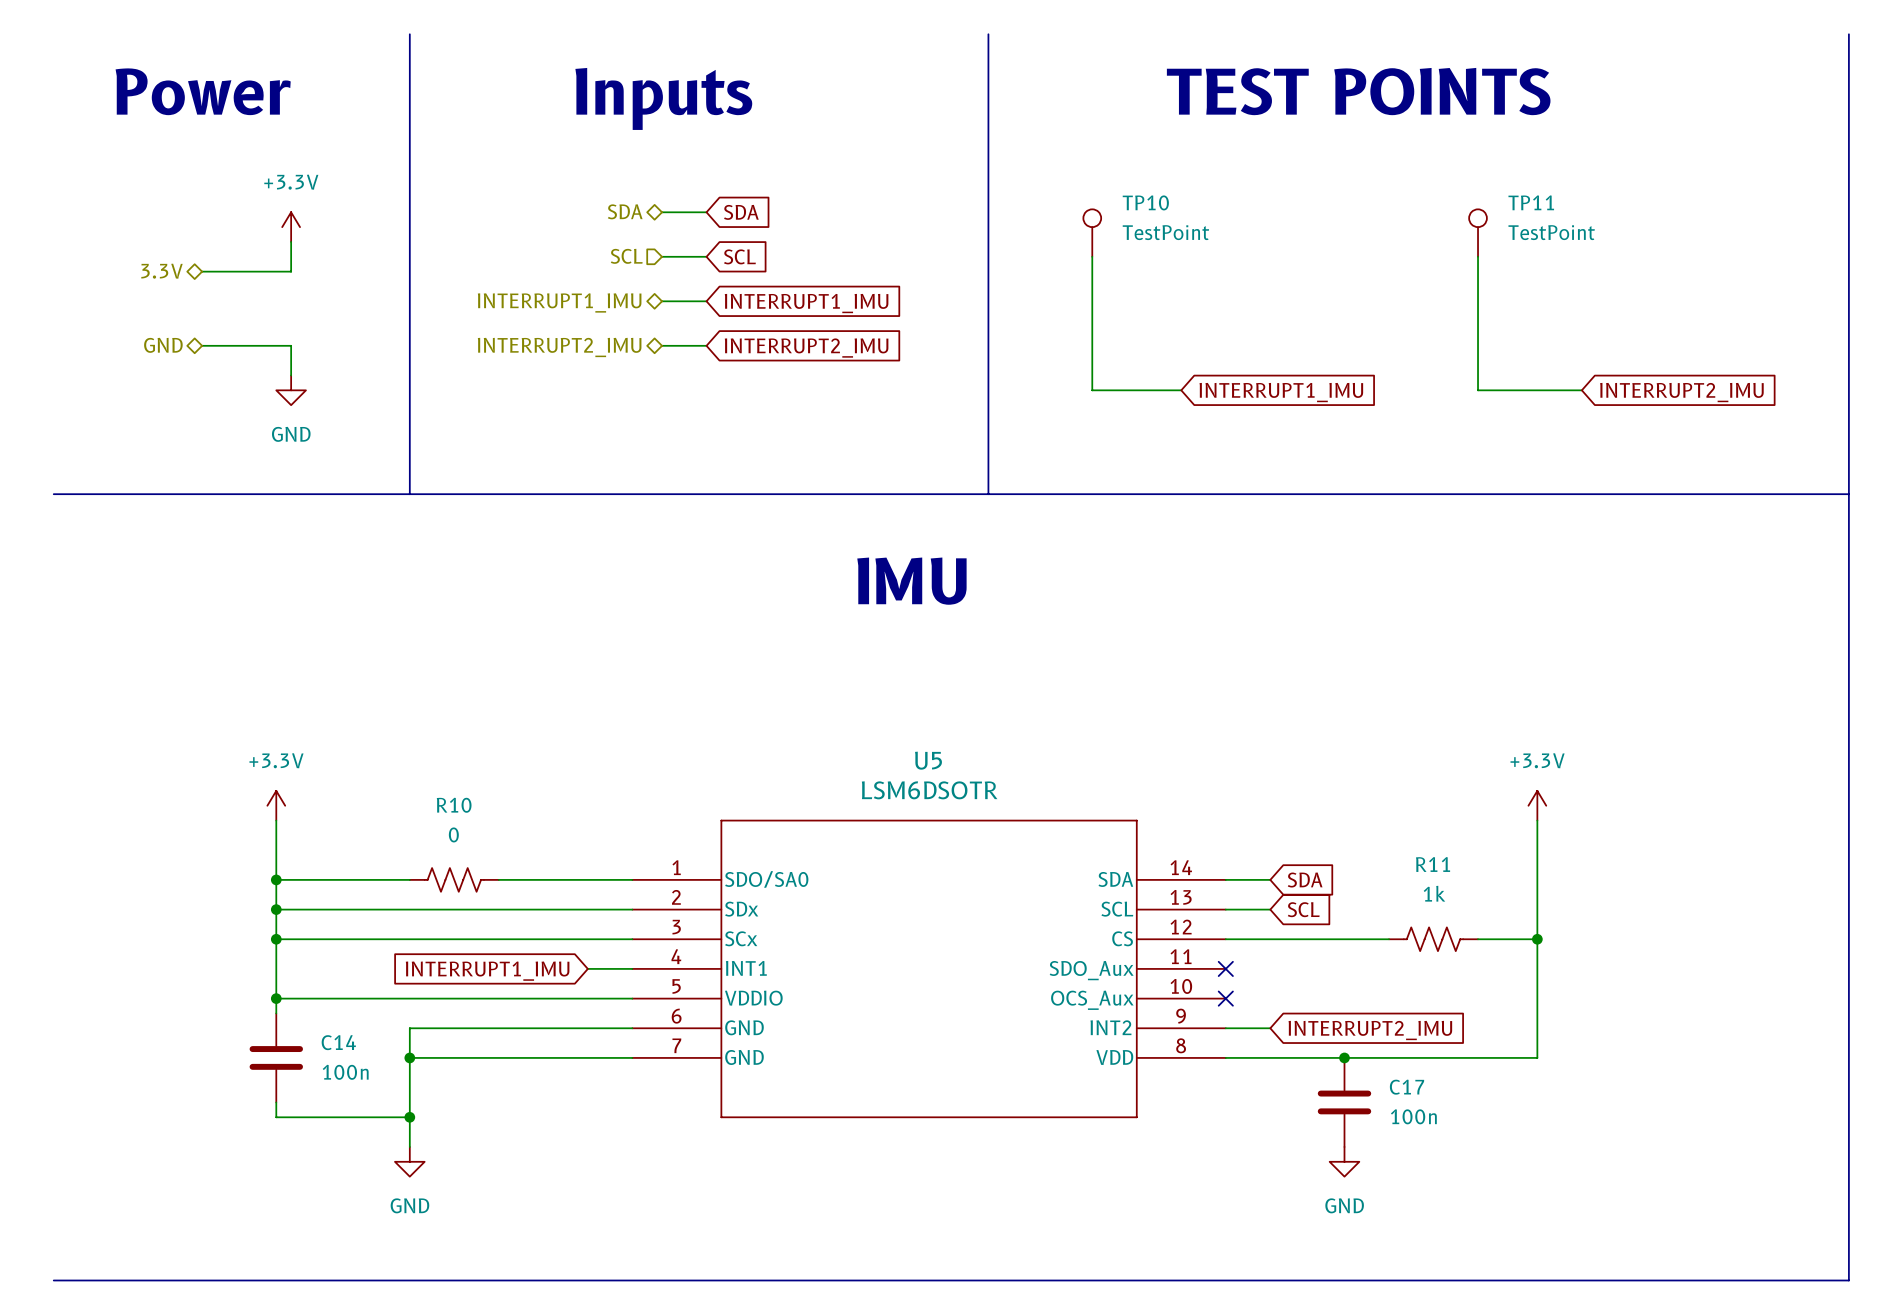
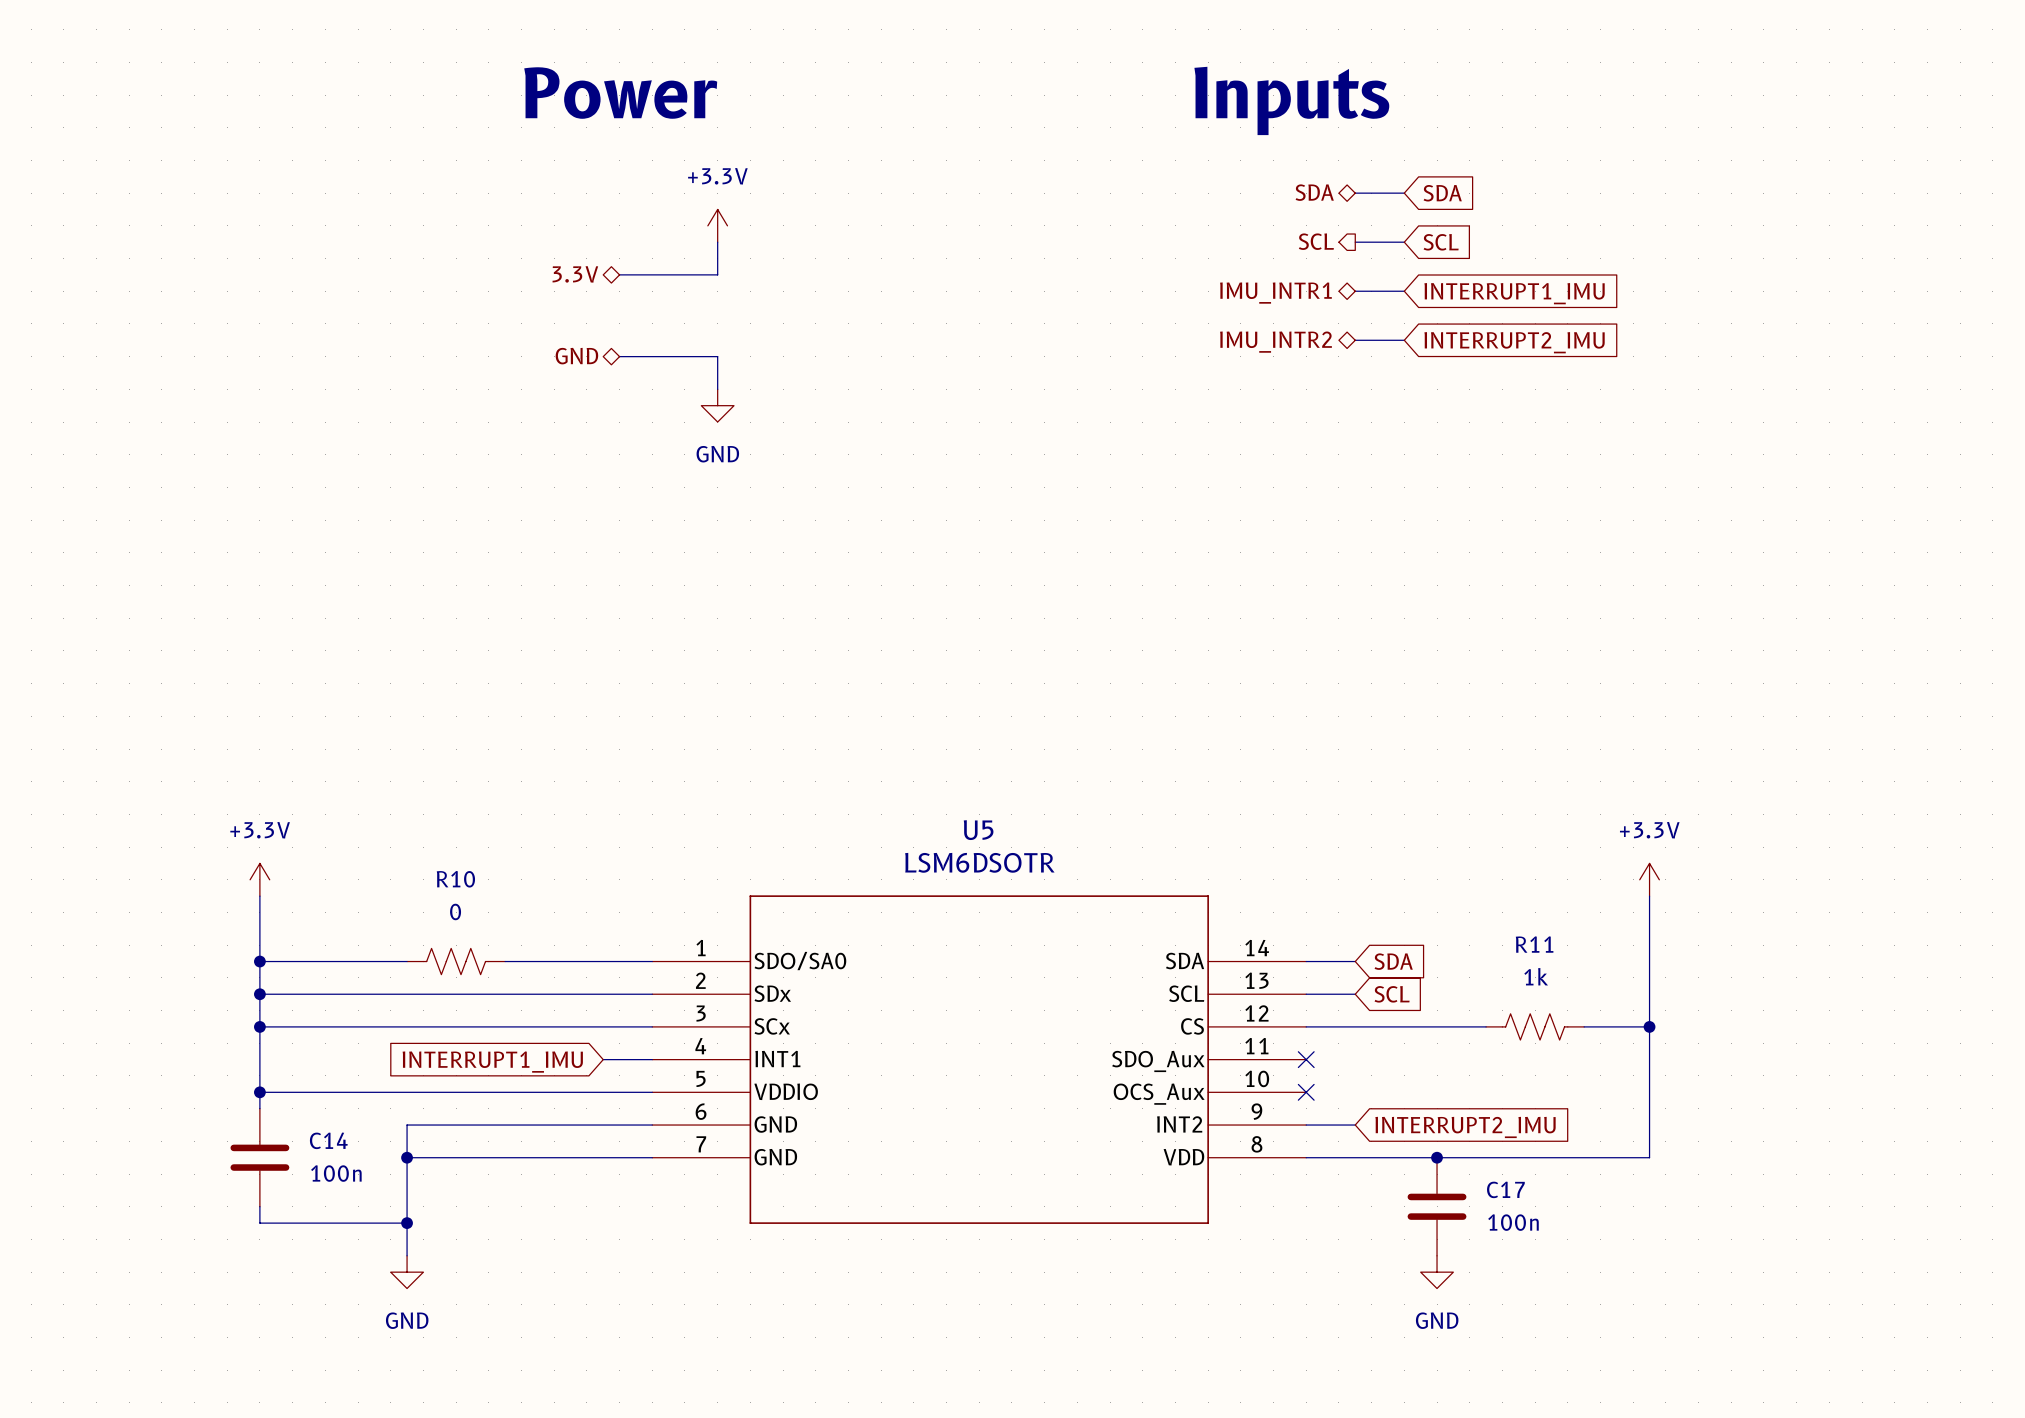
line: (409, 34) (409, 494) -> none
line: (988, 34) (988, 494) -> none
line: (1848, 34) (1848, 1280) (53, 1280) -> none
text: Power (203, 91) -> none
text: none -> Power (620, 93)
text: TEST POINTS (1358, 91) -> none
text: Inputs (663, 98) -> none
text: none -> Inputs (1291, 100)
hierarchical label: none -> SDA (1314, 192)
wire: none -> (1355, 193) (1404, 193)
global label: none -> SDA (1442, 193)
hierarchical label: SDA (625, 211) -> none
wire: (662, 212) (706, 212) -> none
power symbol: none -> +3.3V (717, 225)
global label: SDA (741, 212) -> none
hierarchical label: none -> SCL (1316, 241)
power symbol: +3.3V (291, 227) -> none
wire: none -> (1355, 242) (1404, 242)
global label: none -> SCL (1441, 242)
TP10: TestPoint (1092, 233) -> none
TP11: TestPoint (1478, 233) -> none
wire: (291, 241) (291, 271) (202, 271) -> none
hierarchical label: none -> 3.3V (575, 274)
wire: none -> (619, 274) (684, 274)
hierarchical label: SCL (626, 256) -> none
wire: (691, 256) (706, 256) -> (717, 274) (717, 242)
global label: SCL (739, 256) -> none
wire: (1092, 256) (1092, 390) (1181, 390) -> none
wire: (1478, 256) (1478, 390) (1581, 390) -> none
hierarchical label: 3.3V (161, 271) -> none
wire: none -> (1355, 291) (1404, 291)
hierarchical label: none -> IMU_INTR1 (1275, 293)
wire: (662, 301) (706, 301) -> none
hierarchical label: INTERRUPT1_IMU (559, 302) -> none
global label: INTERRUPT1_IMU (806, 303) -> none
wire: none -> (1355, 340) (1404, 340)
hierarchical label: none -> IMU_INTR2 (1275, 342)
hierarchical label: none -> GND (576, 356)
wire: none -> (619, 356) (717, 356) (717, 389)
hierarchical label: GND (163, 345) -> none
wire: (202, 345) (291, 345) (291, 375) -> none
wire: (662, 345) (706, 345) -> none
hierarchical label: INTERRUPT2_IMU (559, 347) -> none
global label: INTERRUPT2_IMU (806, 348) -> none
power symbol: none -> GND (717, 405)
power symbol: GND (291, 390) -> none
global label position: INTERRUPT1_IMU (1281, 392) -> INTERRUPT1_IMU (1514, 293)
global label position: INTERRUPT2_IMU (1681, 392) -> INTERRUPT2_IMU (1514, 342)
line: (53, 494) (1848, 494) -> none
text: IMU (911, 581) -> none

